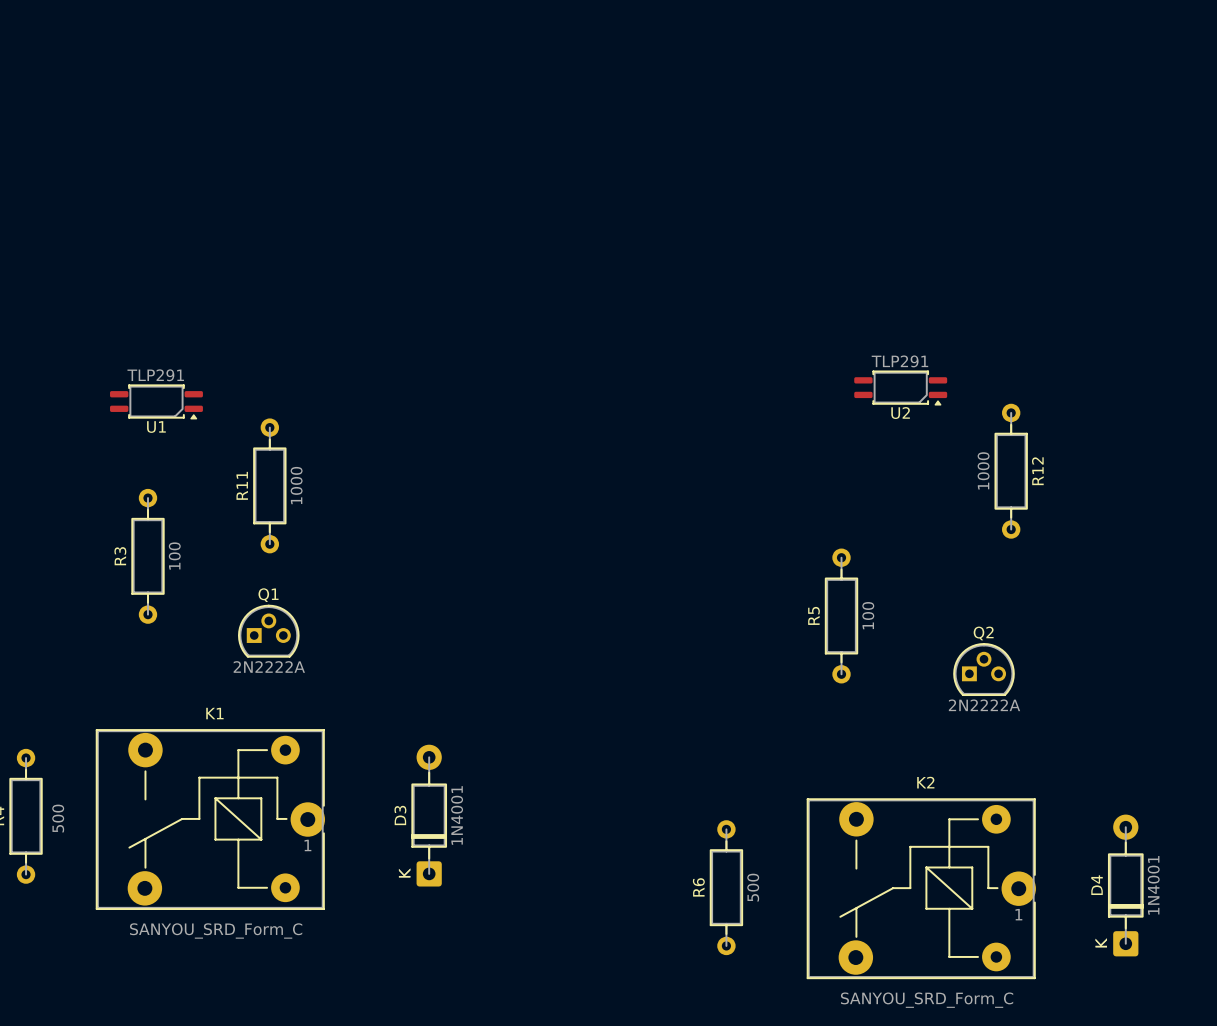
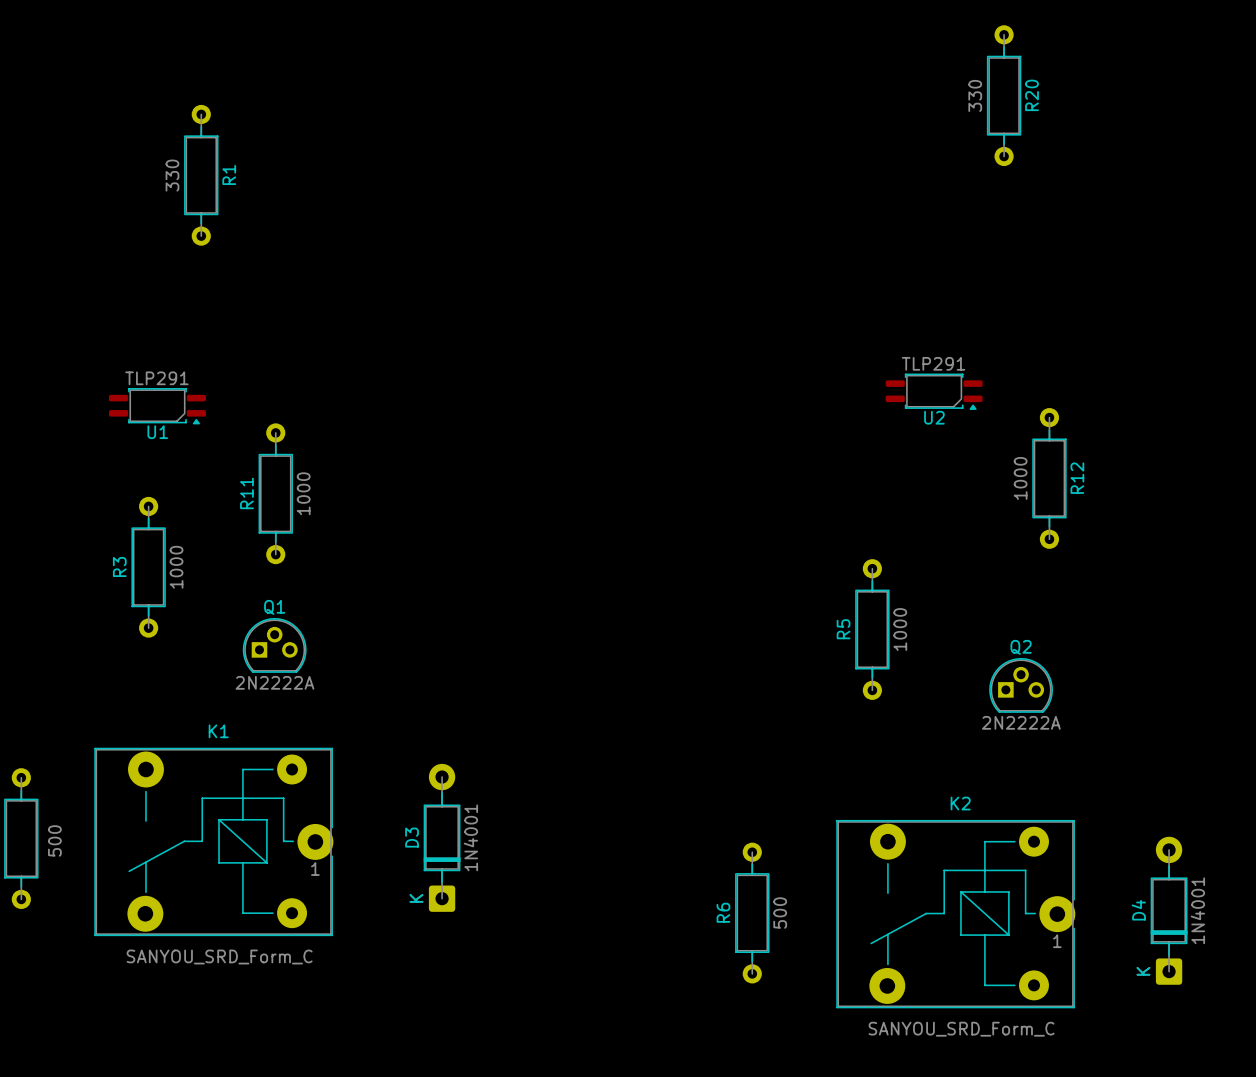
R20: none -> 330 (1004, 95)
R1: none -> 330 (201, 175)
R3 value: 100 (174, 556) -> 1000 (176, 567)
R5 value: 100 (868, 615) -> 1000 (900, 629)

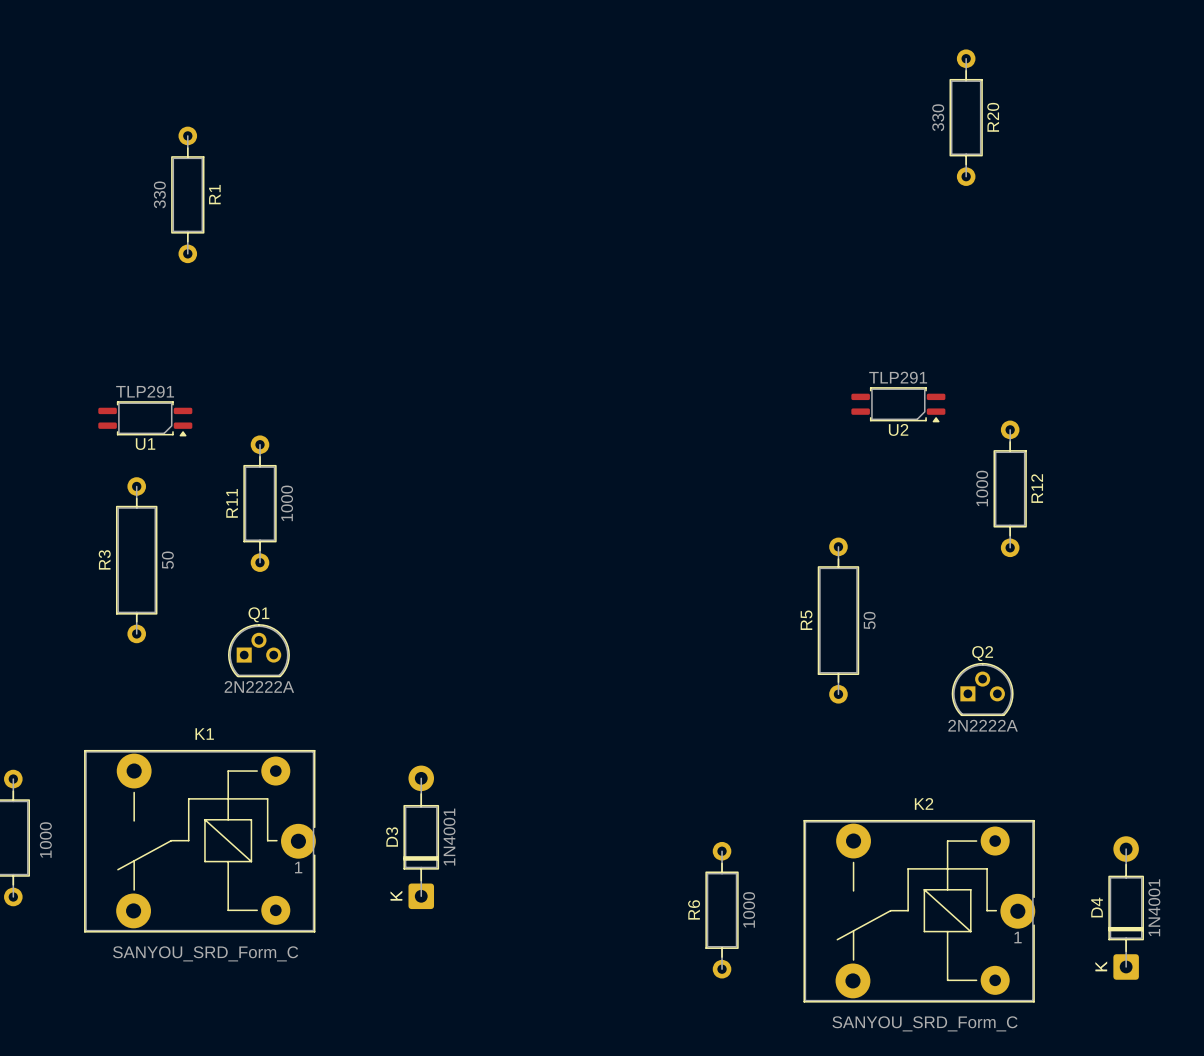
R3 footprint: [131, 496, 166, 638] -> [116, 477, 158, 644]
R5 footprint: [855, 559, 890, 700] -> [817, 537, 860, 704]
R3 value: 1000 (176, 567) -> 50 (167, 560)
R5 value: 1000 (900, 629) -> 50 (869, 620)
part value: 500 (54, 840) -> 1000 (45, 840)
R6 value: 500 (780, 913) -> 1000 (749, 909)

